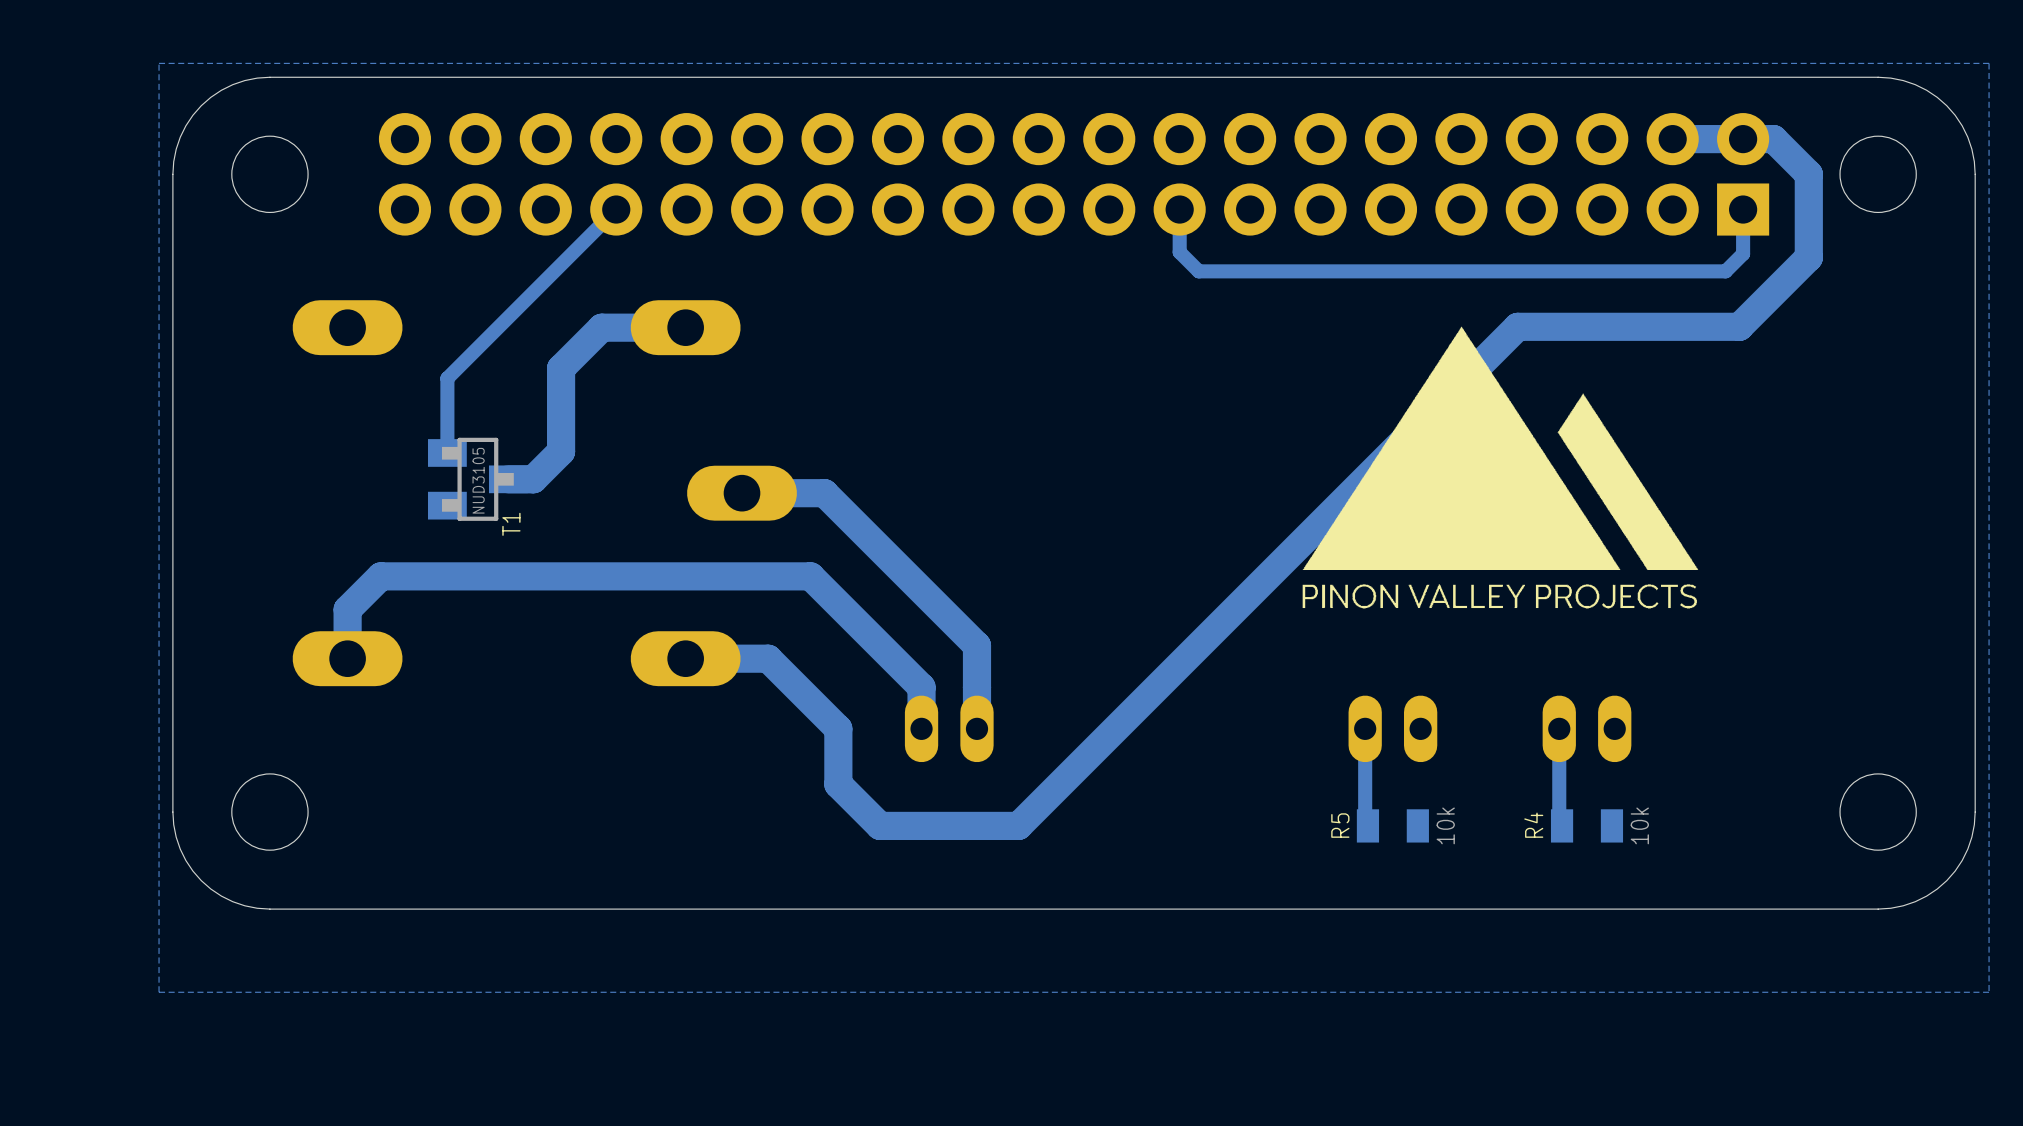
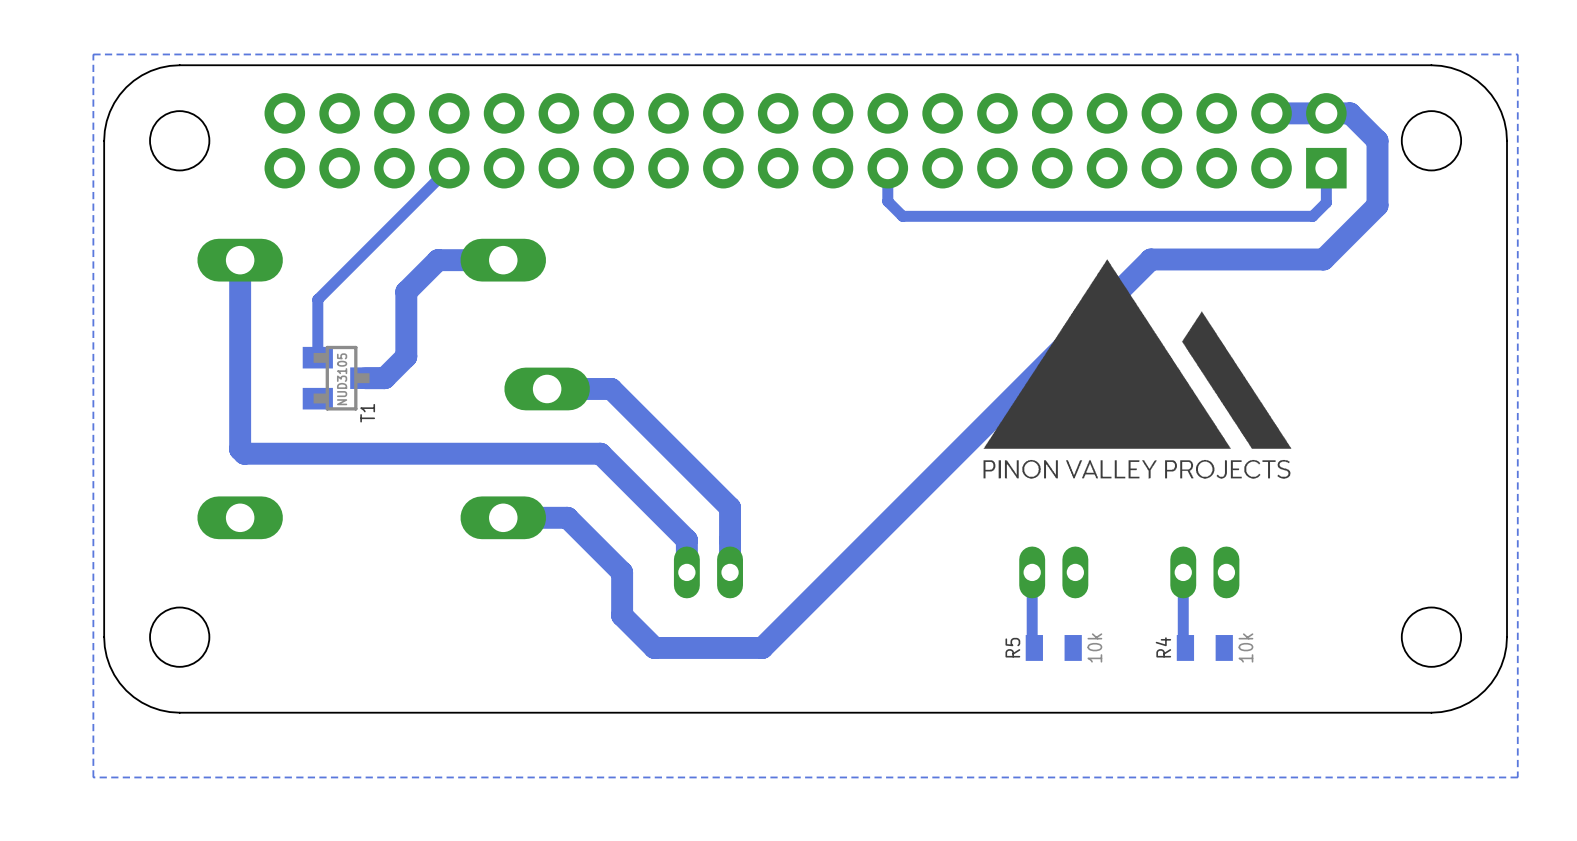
track: (380, 576) (347, 609) (347, 658) -> (266, 453) (244, 453) (240, 449) (240, 260)

